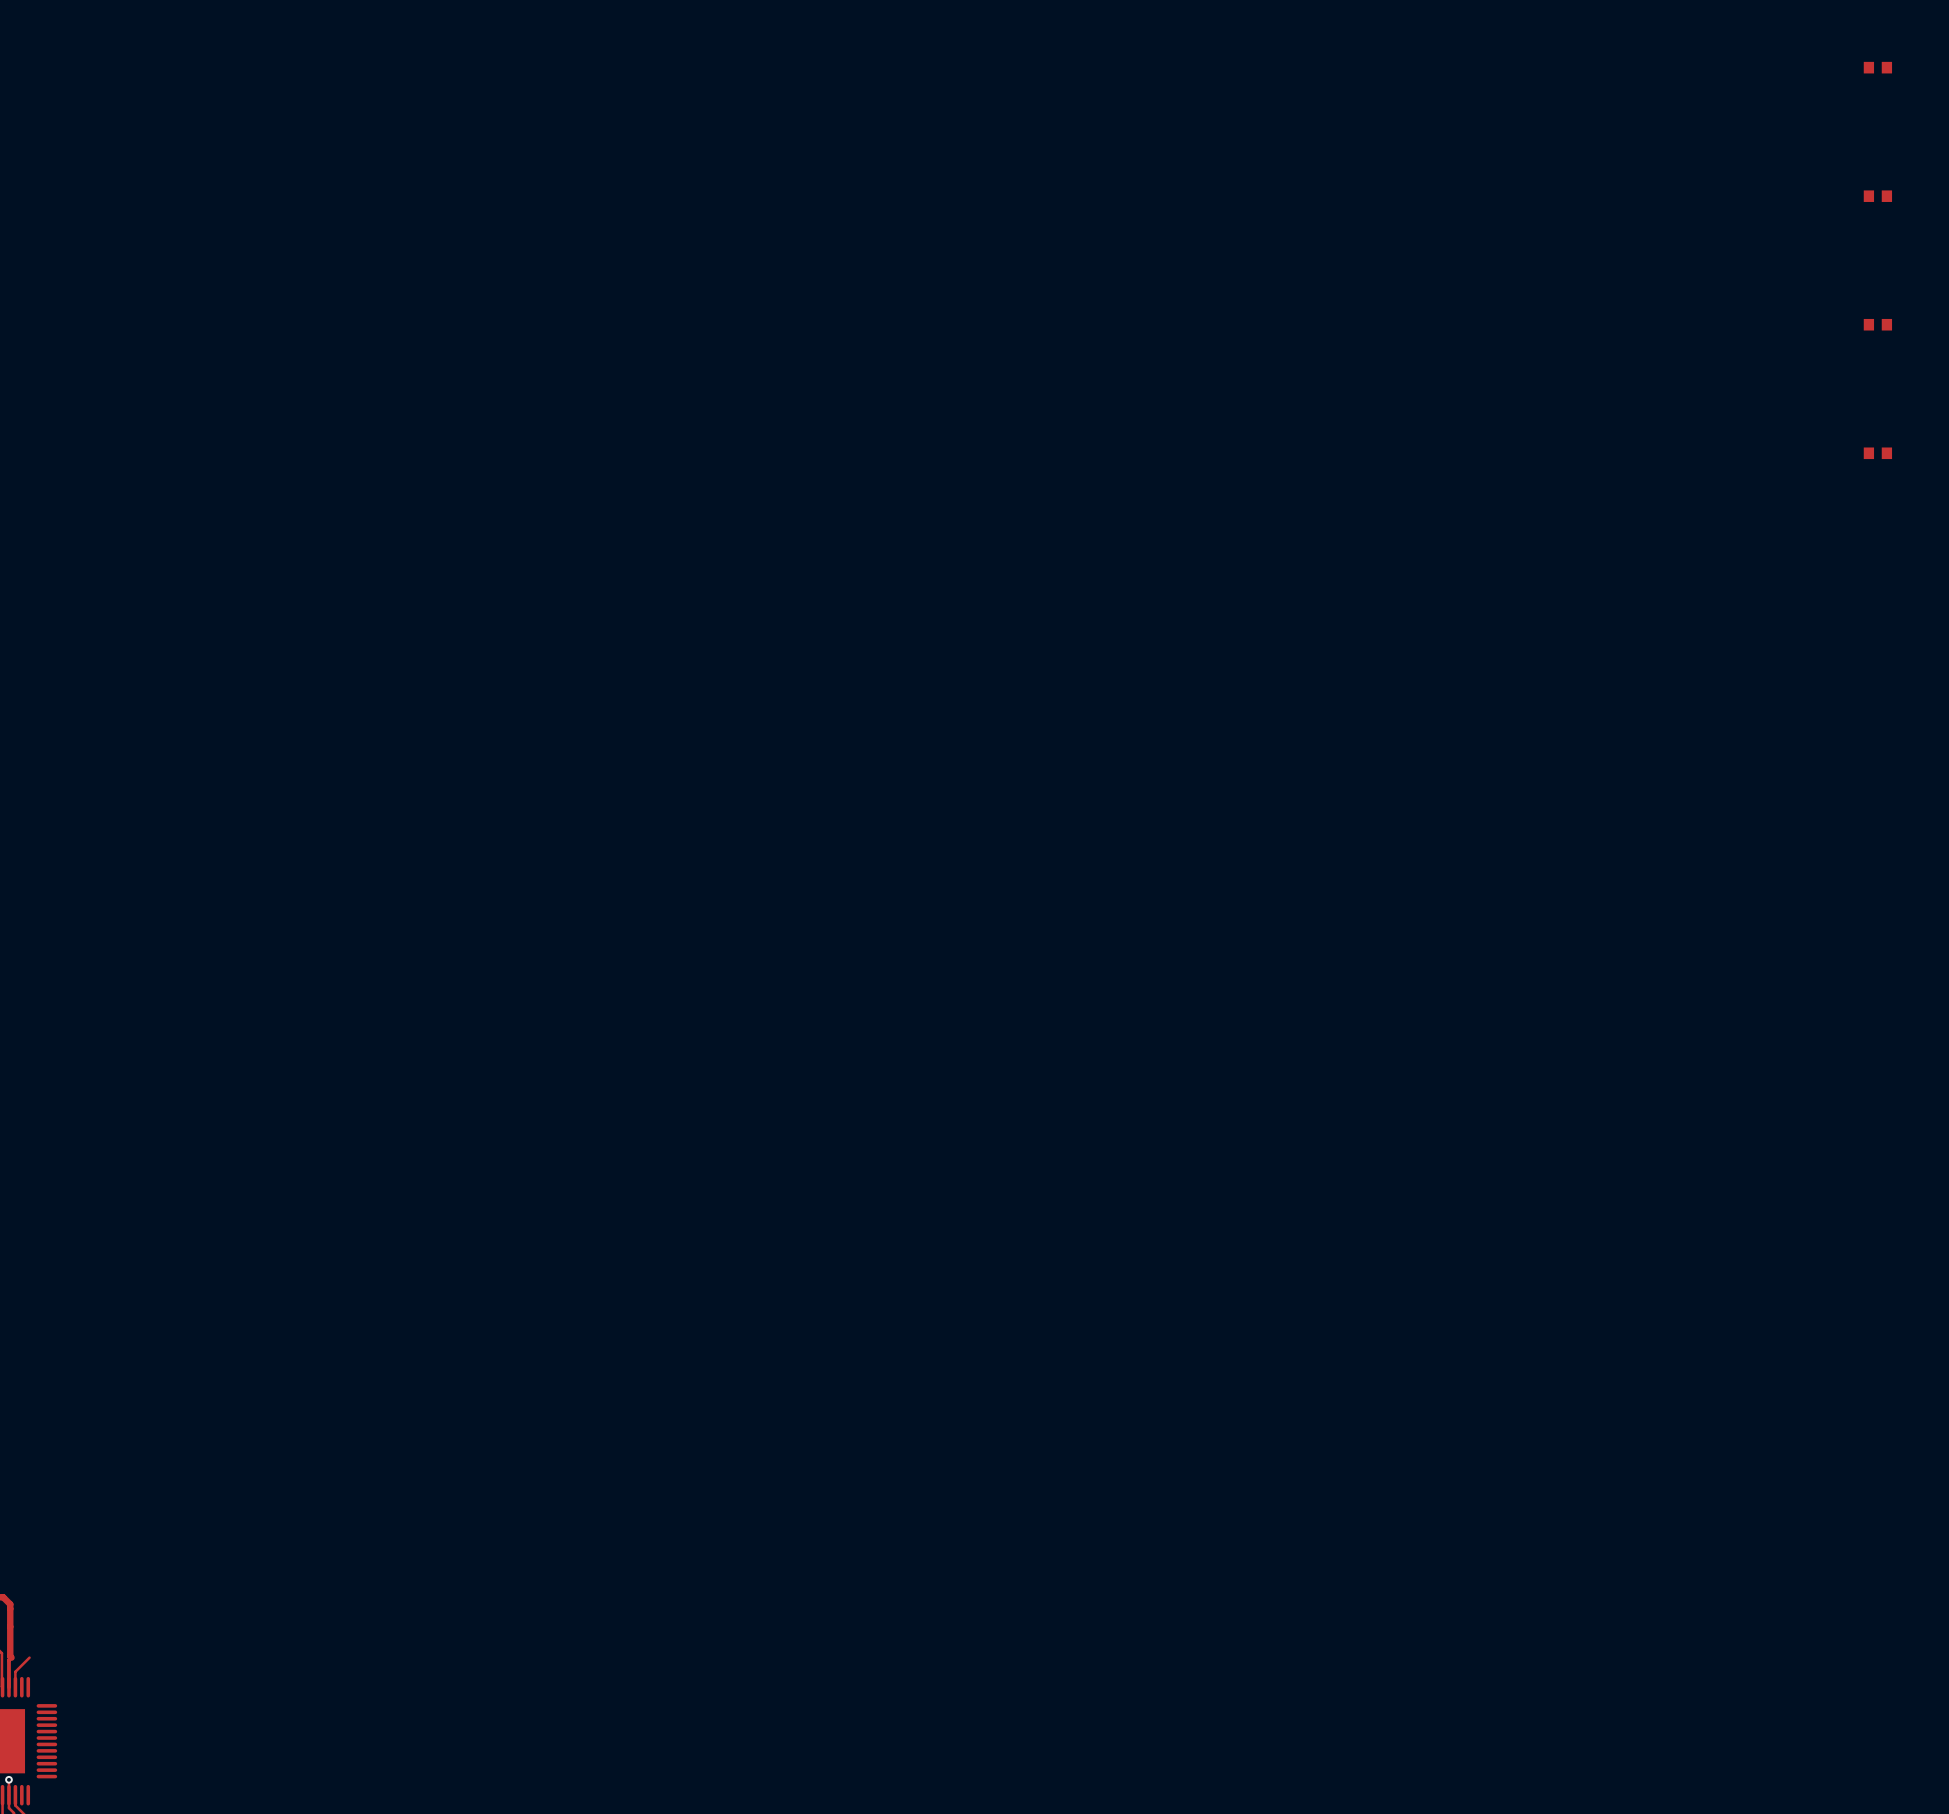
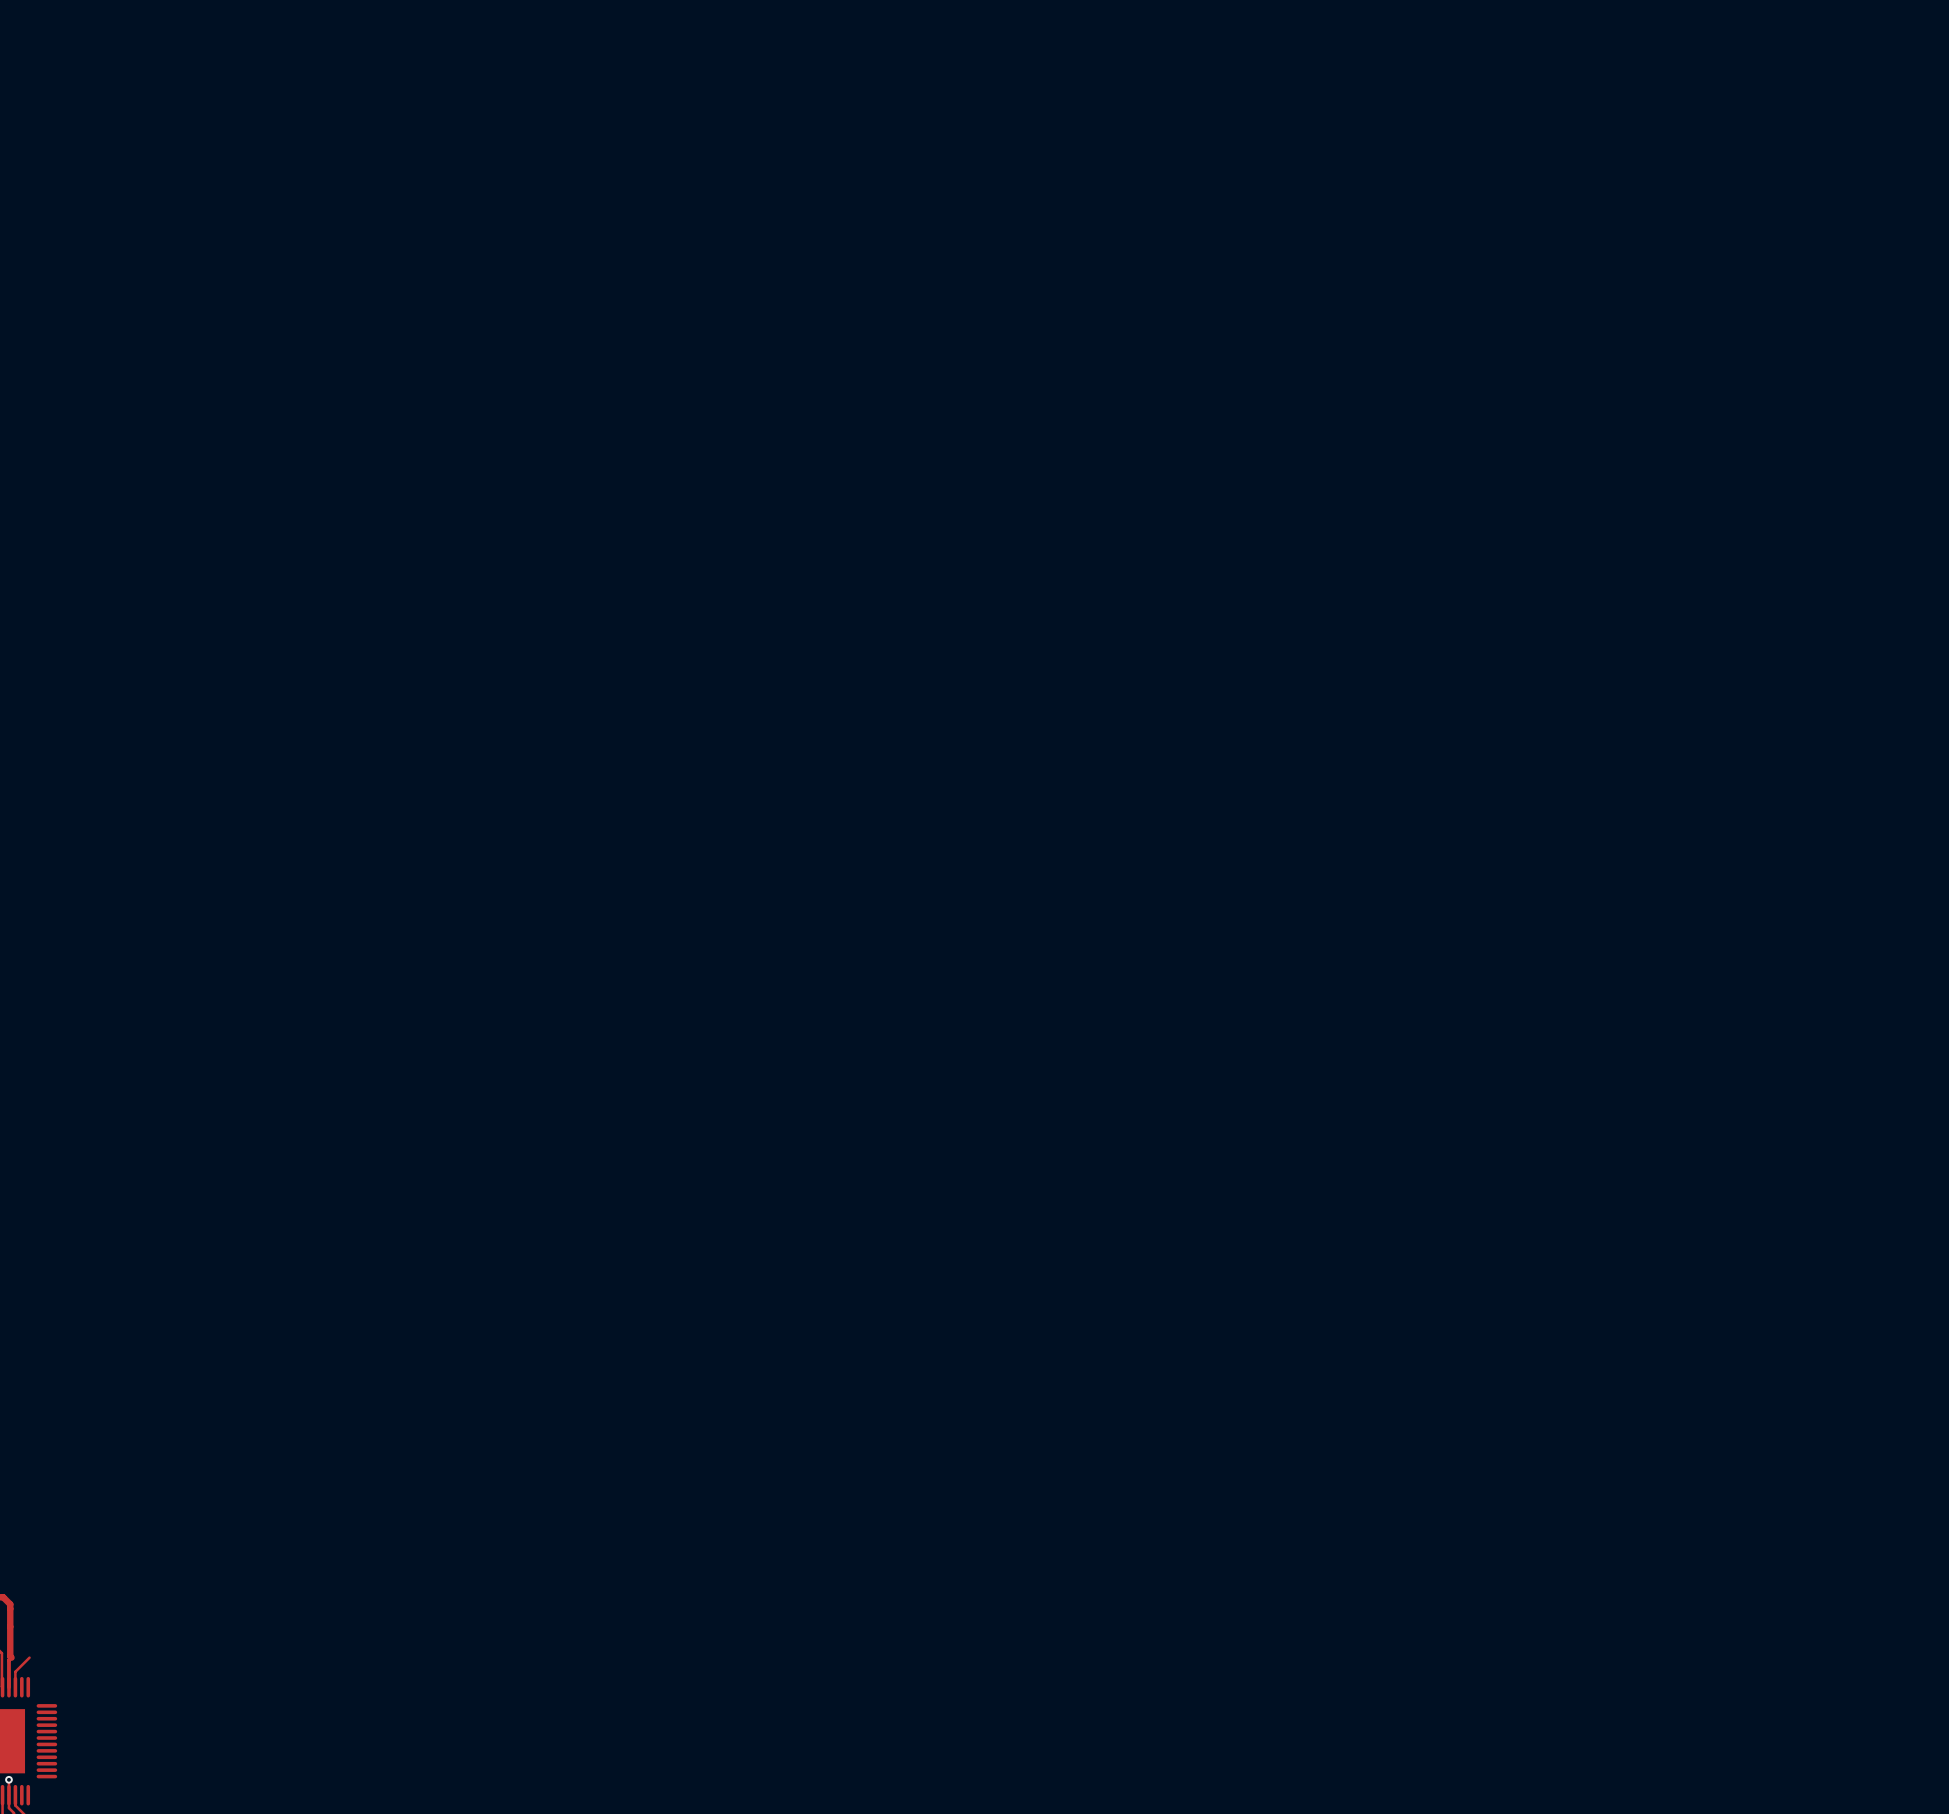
part: (1877, 67) -> none
part: (1877, 196) -> none
part: (1877, 324) -> none
part: (1877, 453) -> none

